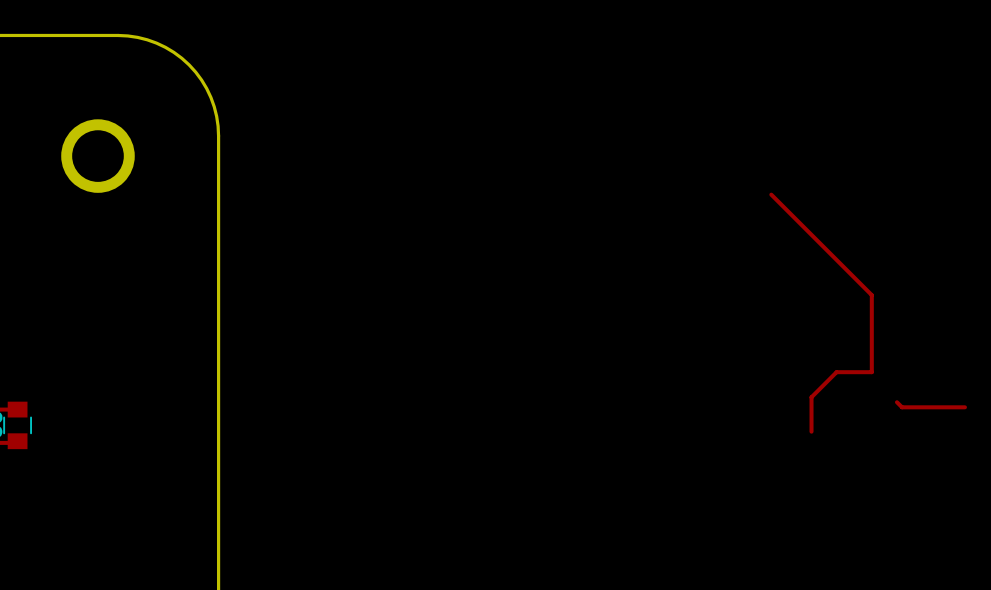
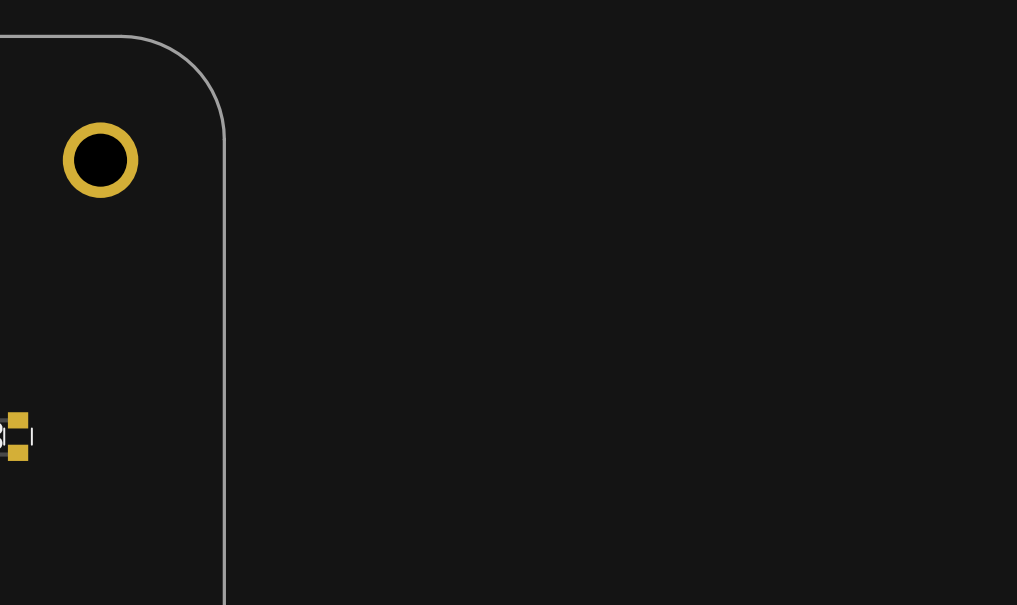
track: (771, 194) (871, 295) (871, 372) (836, 372) (811, 397) (811, 431) -> none
track: (896, 402) (902, 407) (964, 407) -> none

